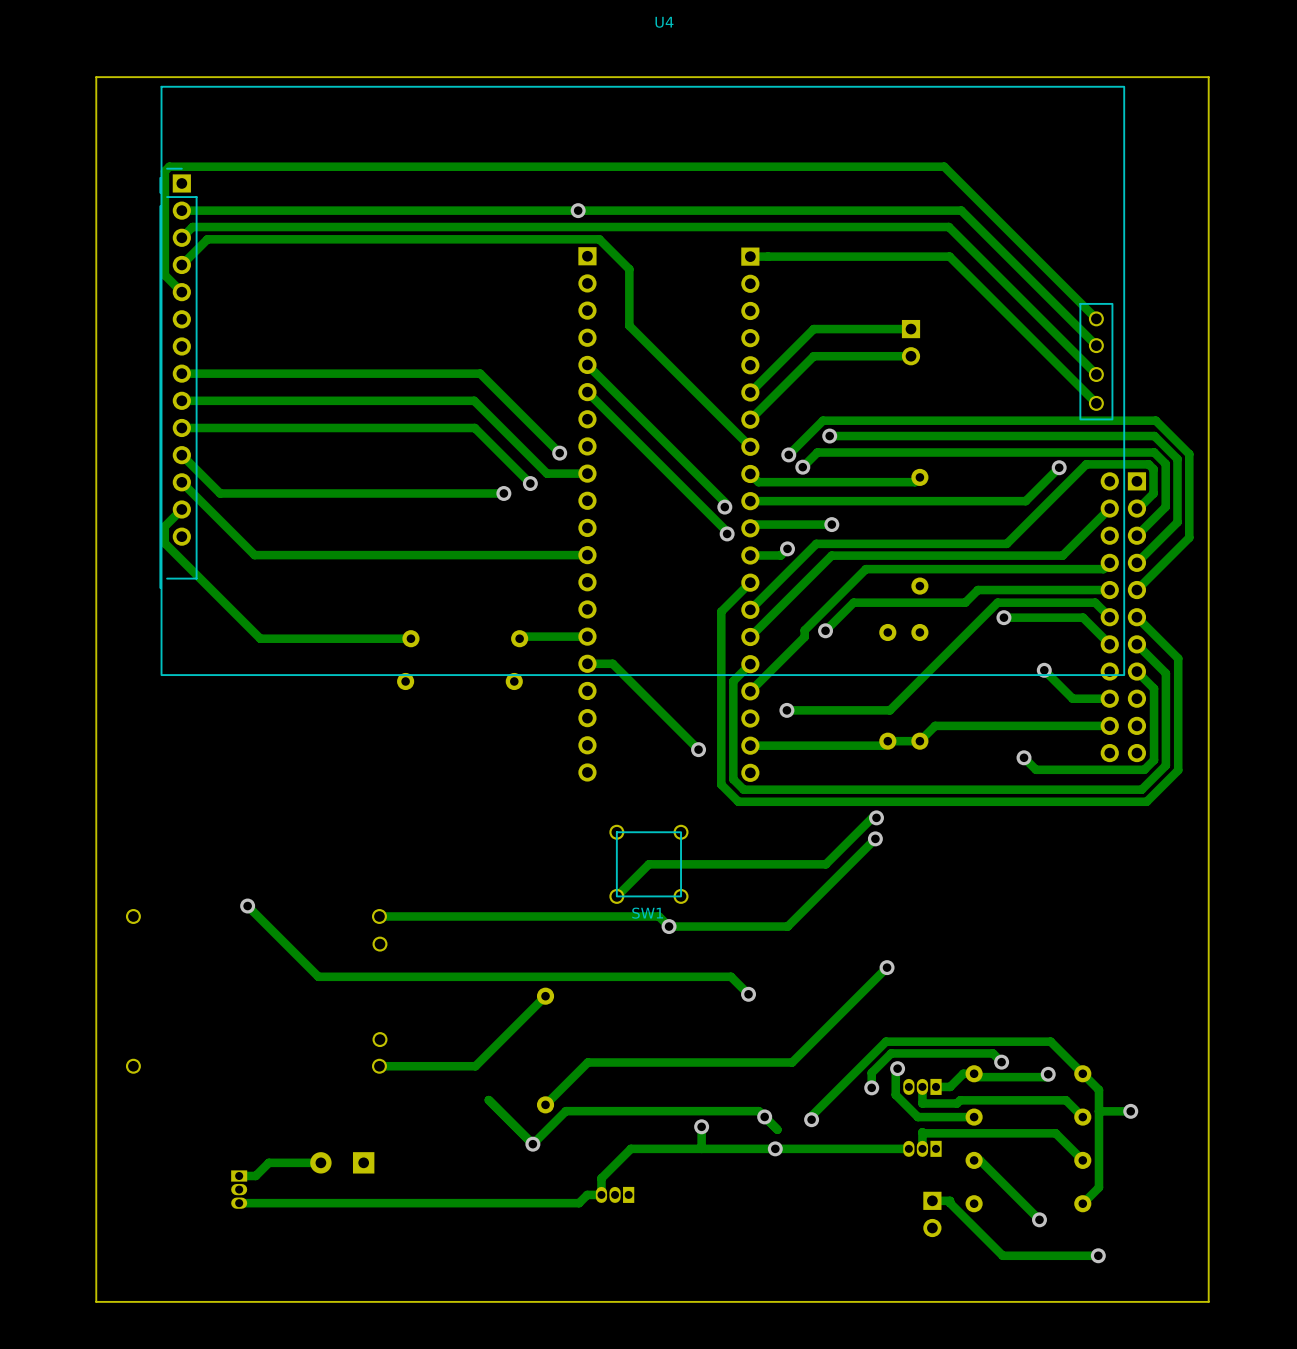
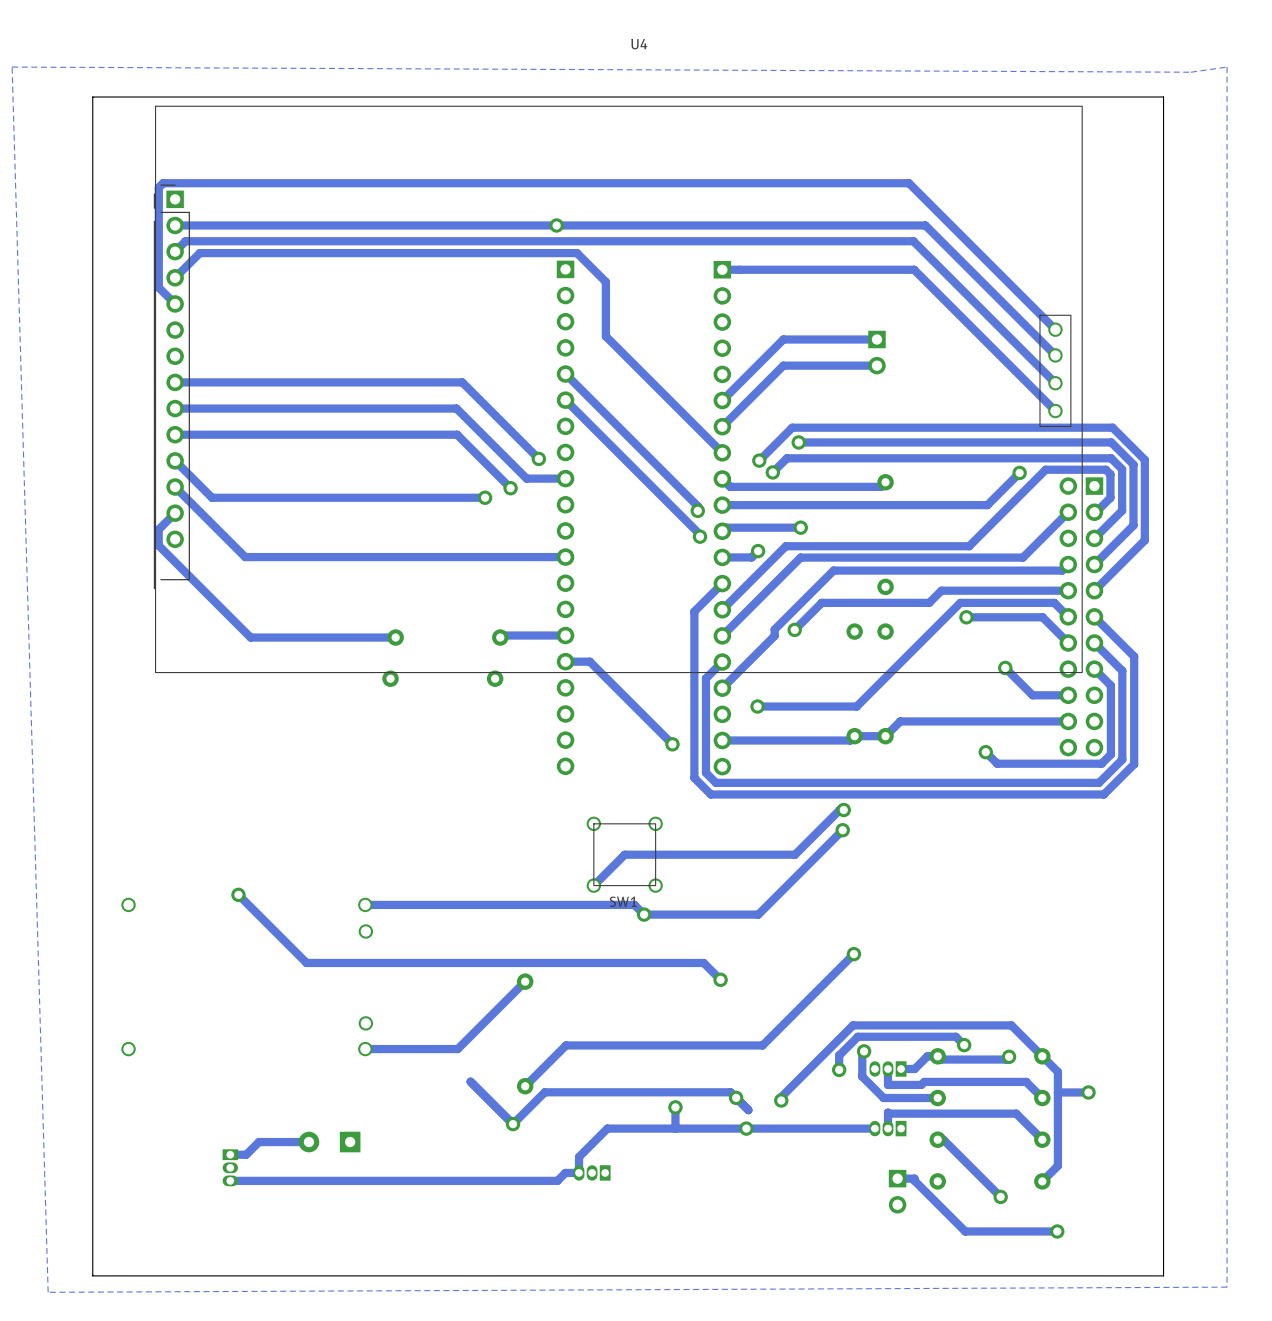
zone outline: none -> (1227, 67) (1191, 72) (12, 67) (48, 1292) (1227, 1287) (1227, 67)

